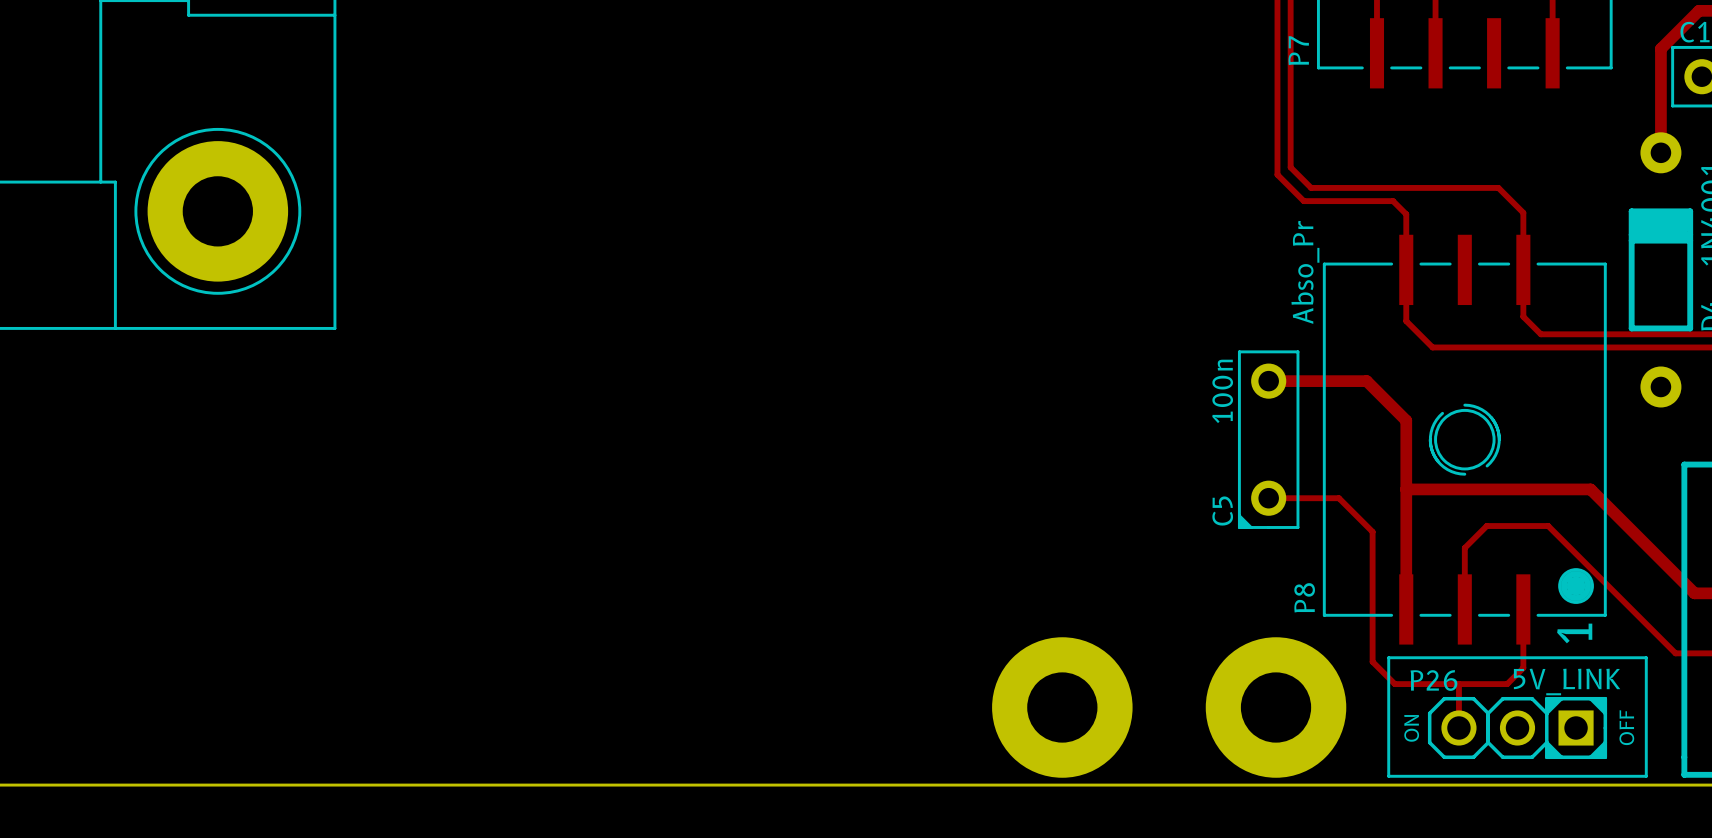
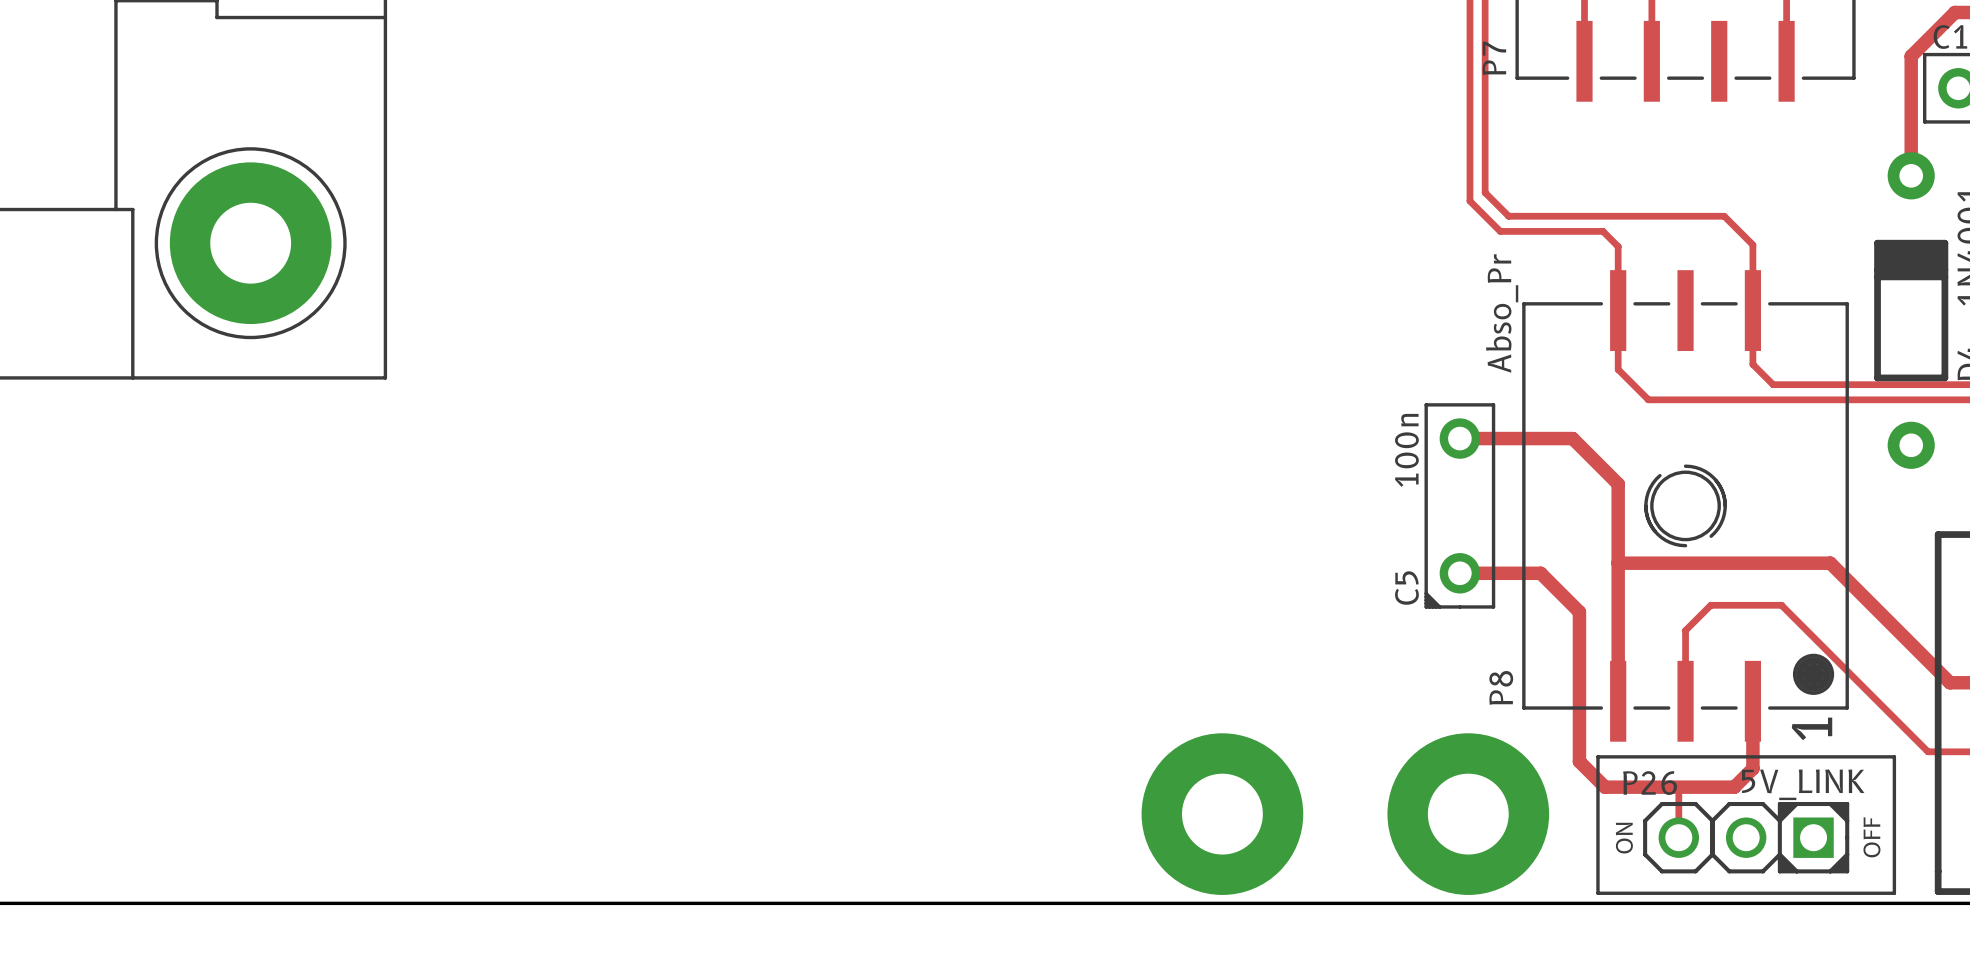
track width: thin (1268, 498) (1338, 498) (1372, 531) (1372, 661) (1394, 684) (1507, 684) (1523, 667) (1523, 609) -> thick (1459, 573) (1540, 573) (1579, 612) (1579, 761) (1605, 787) (1734, 787) (1752, 768) (1752, 701)

